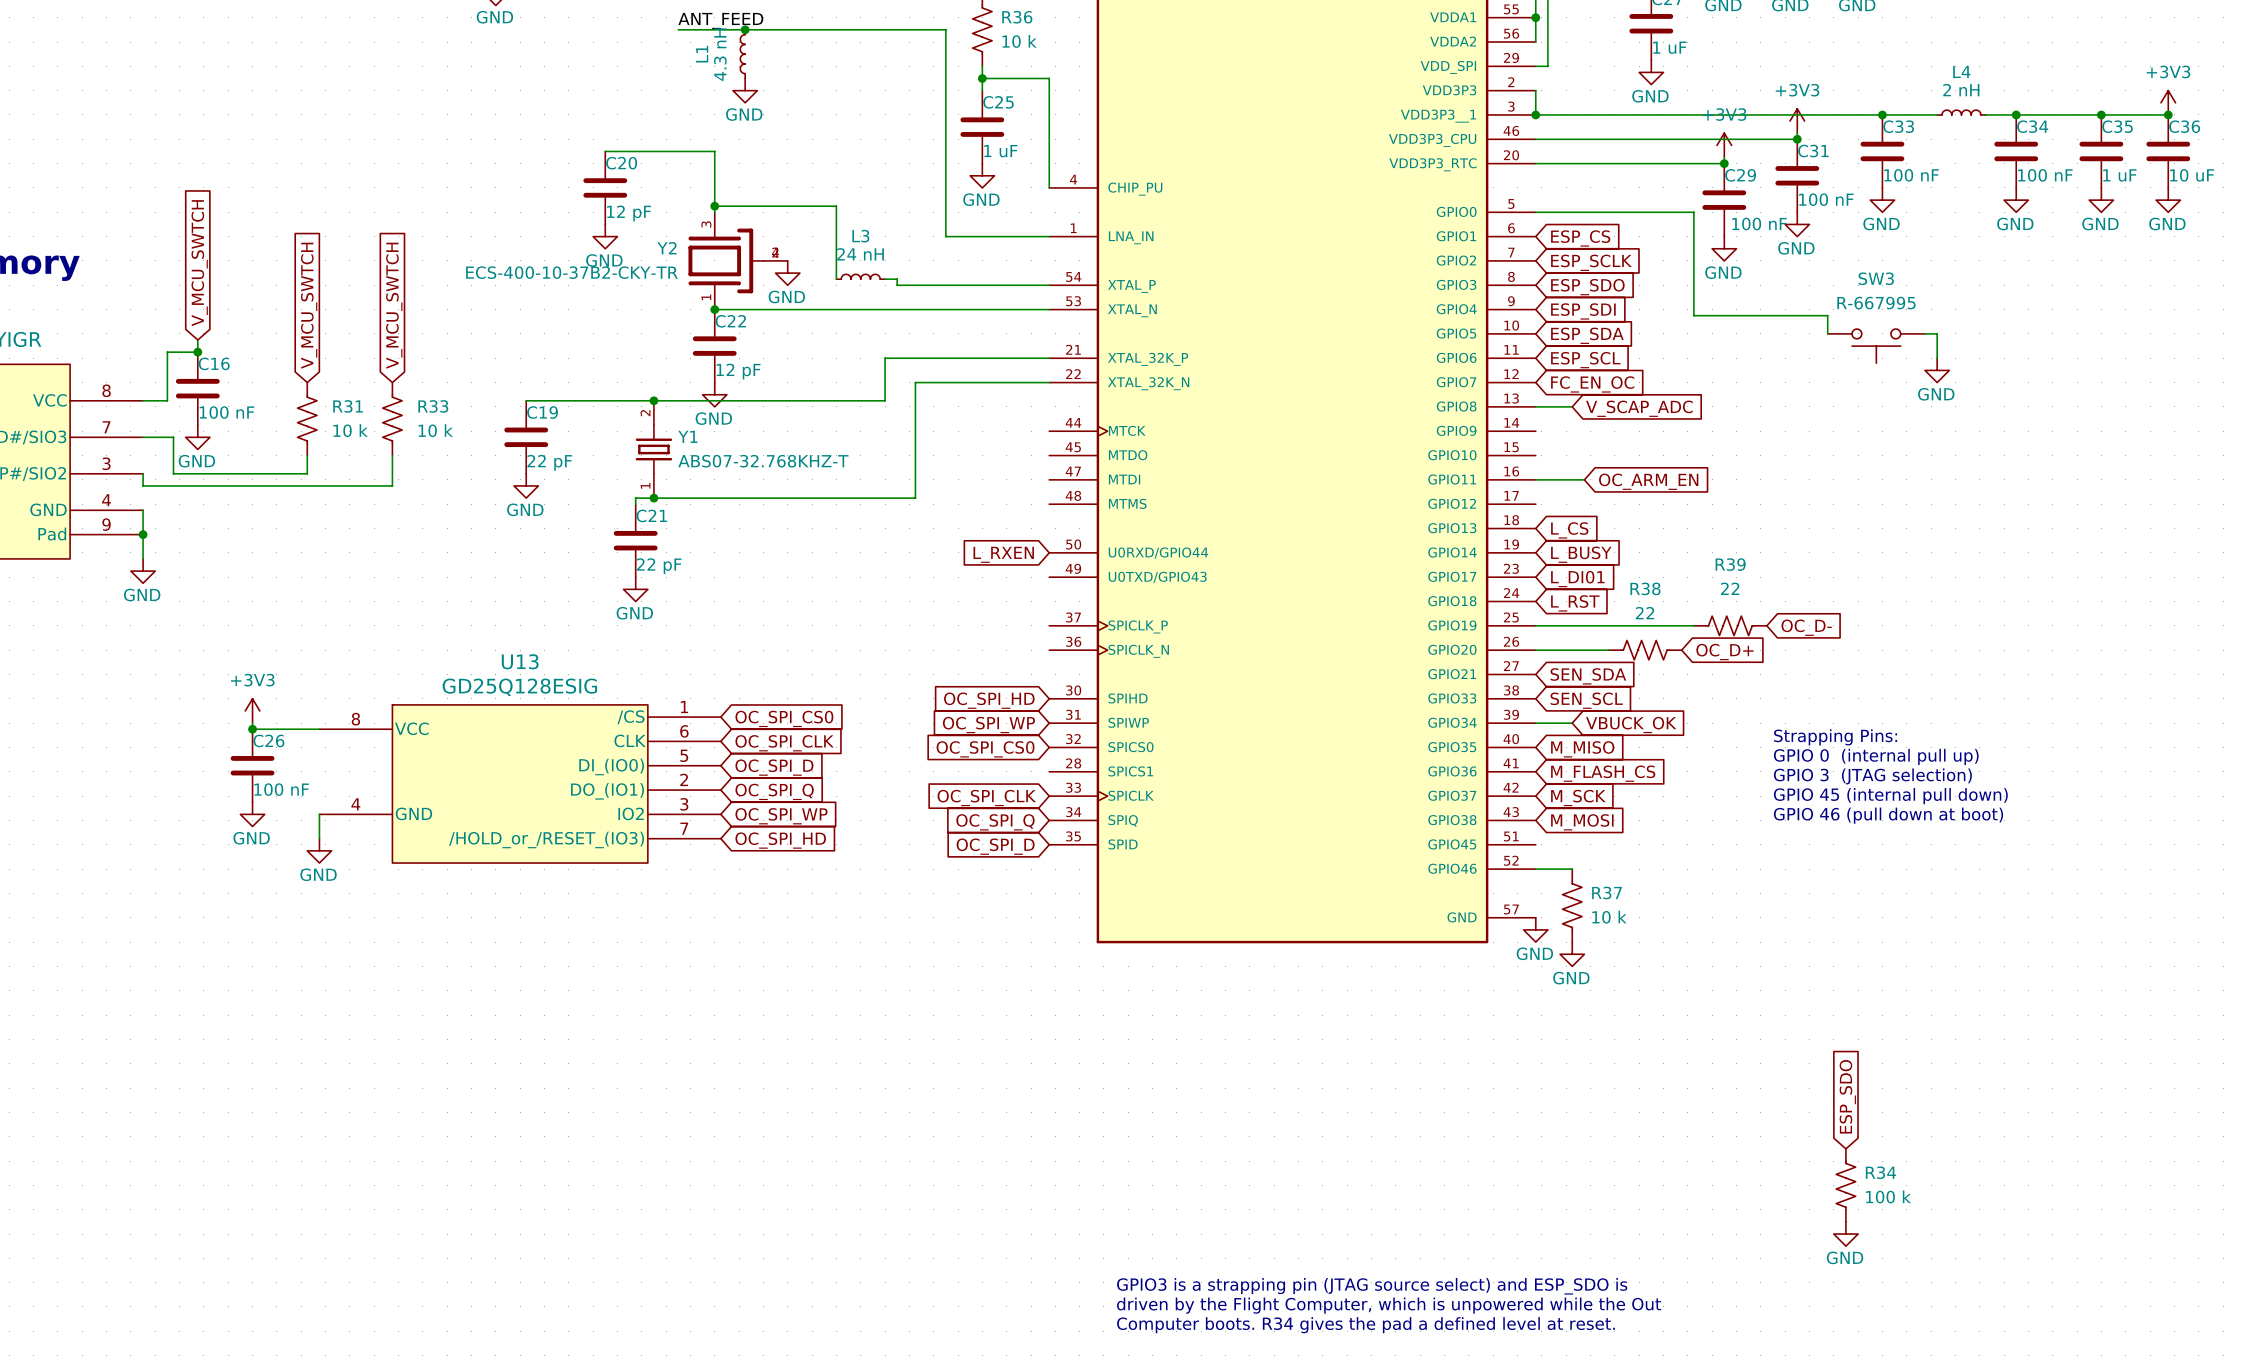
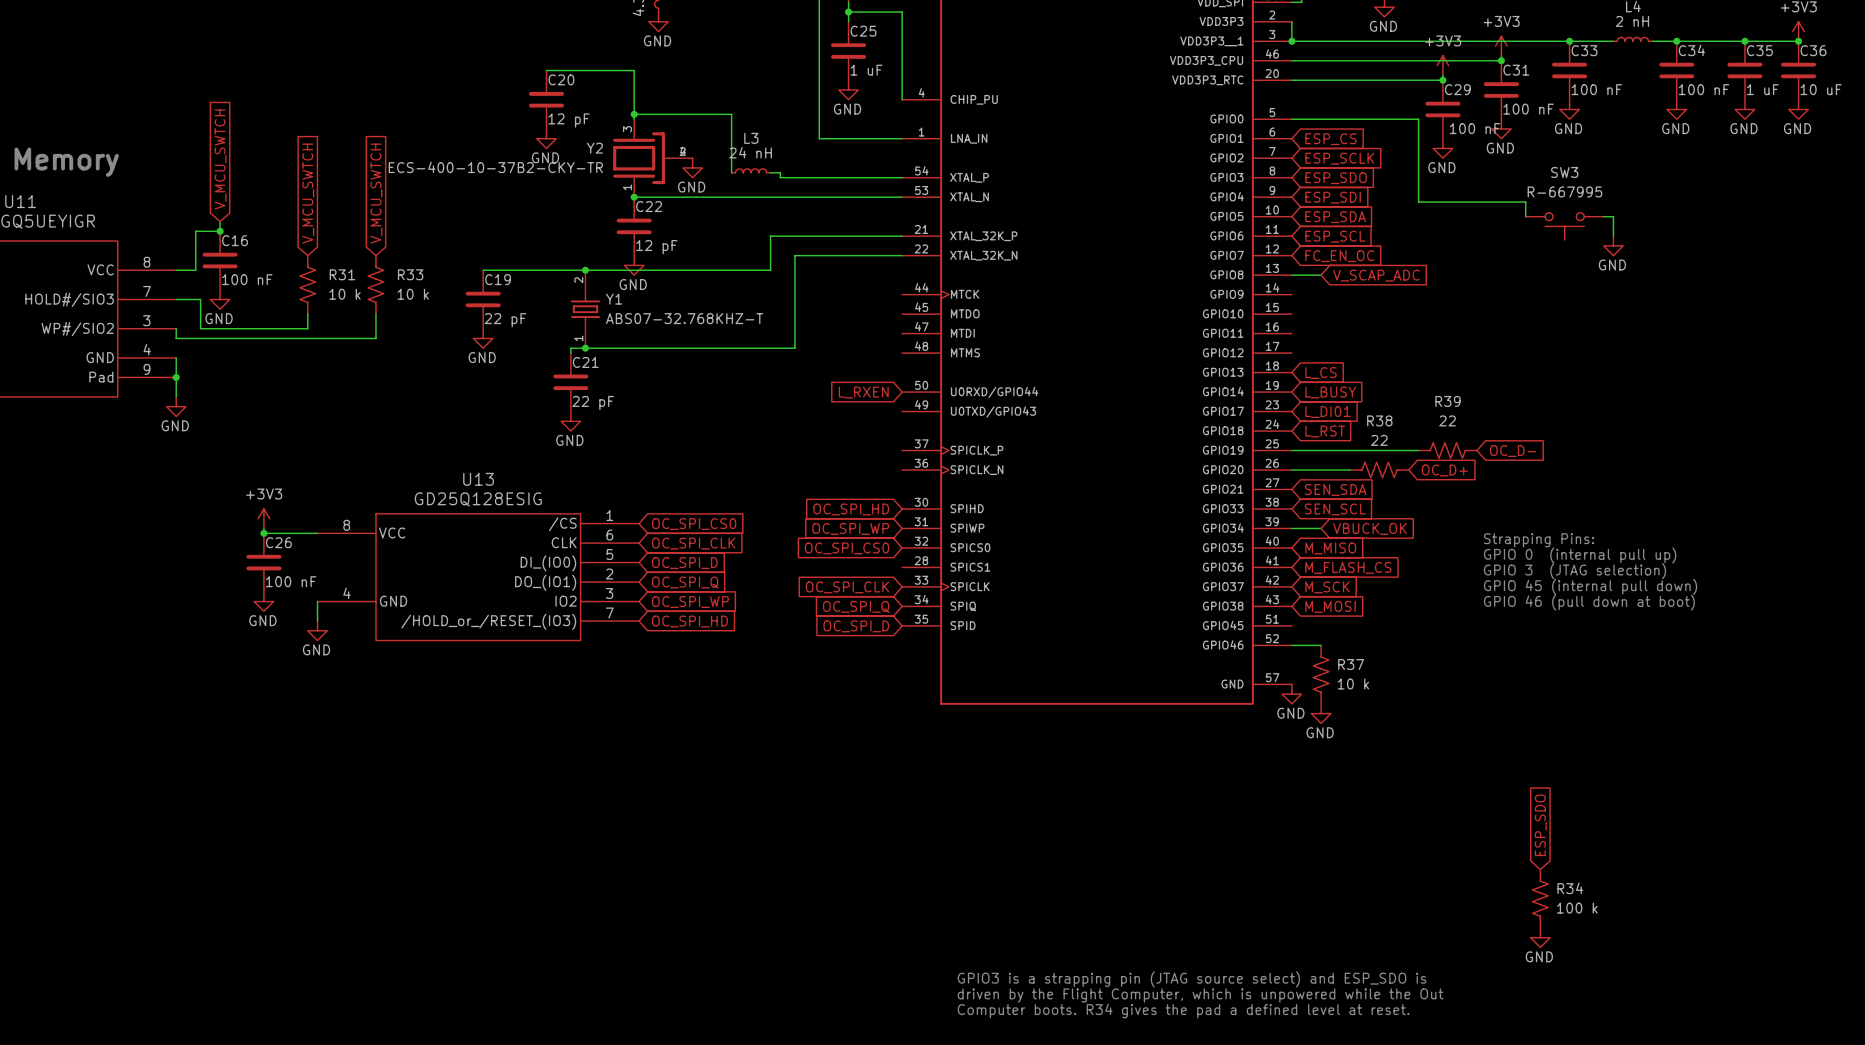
wire: (1535, 479) (1584, 479) -> none
global label: OC_ARM_EN (1648, 481) -> none

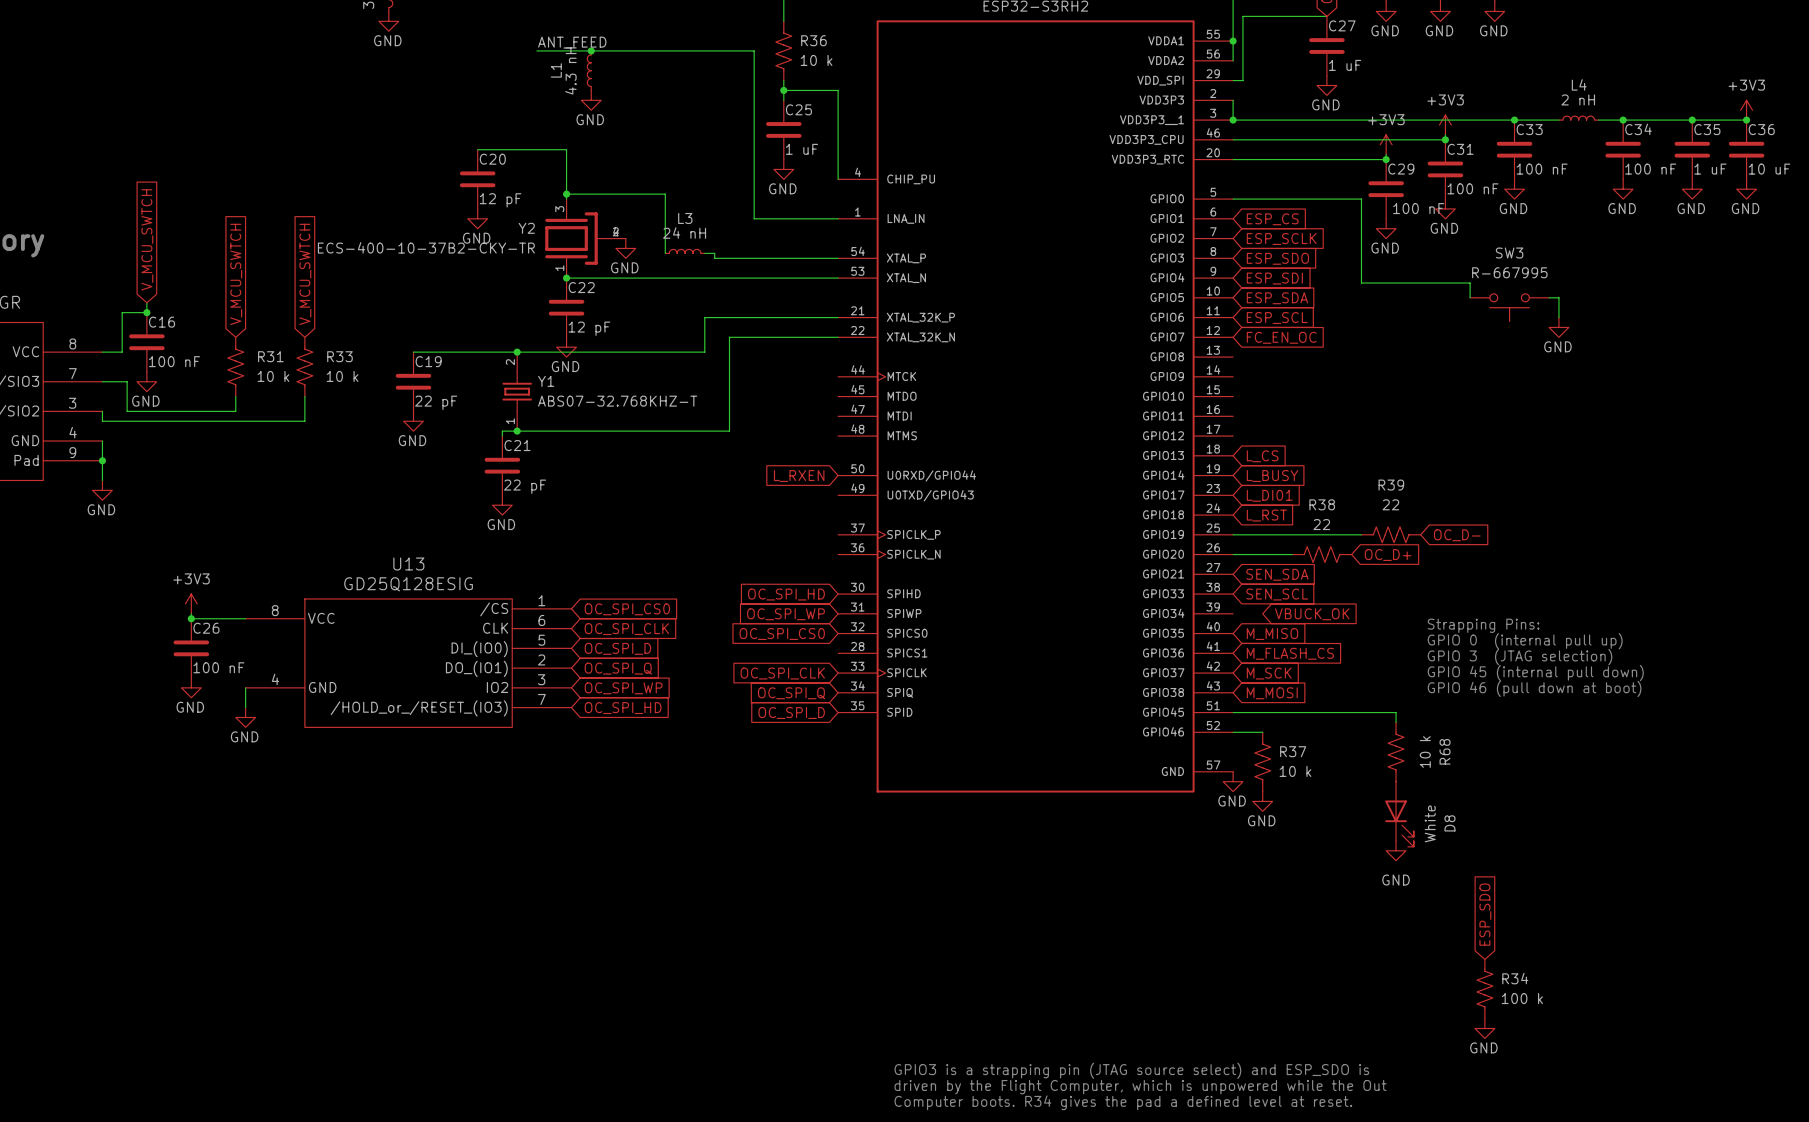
wire: (1291, 275) (1321, 275) -> none
global label: V_SCAP_ADC (1376, 275) -> none
wire: (1291, 528) (1321, 528) -> none
wire: none -> (1233, 712) (1396, 712) (1396, 722)
R68: none -> 10 k (1396, 752)
D8: none -> White (1399, 814)
power symbol: none -> GND (1396, 850)

